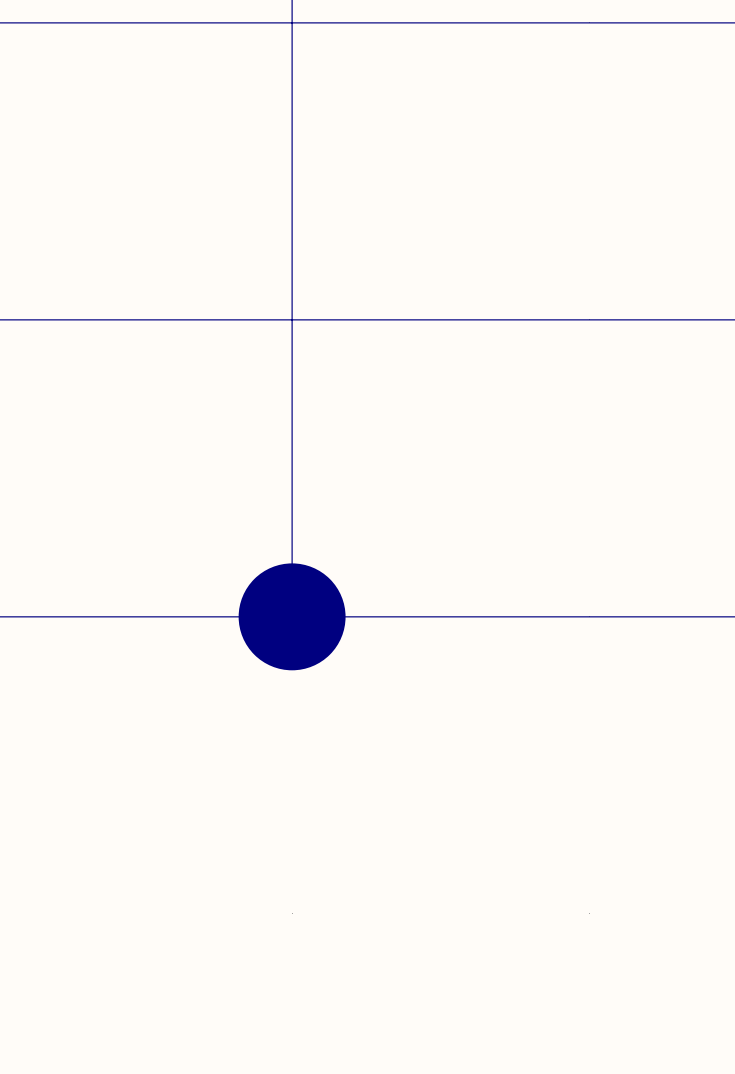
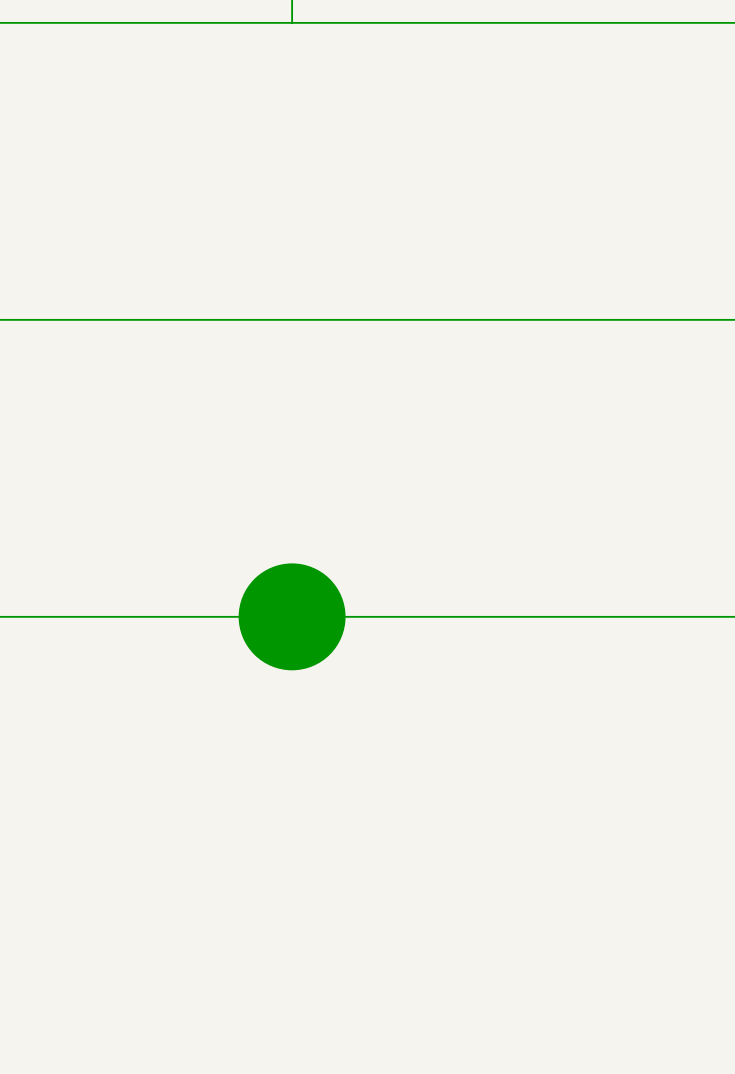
wire: (292, 22) (292, 616) -> none

